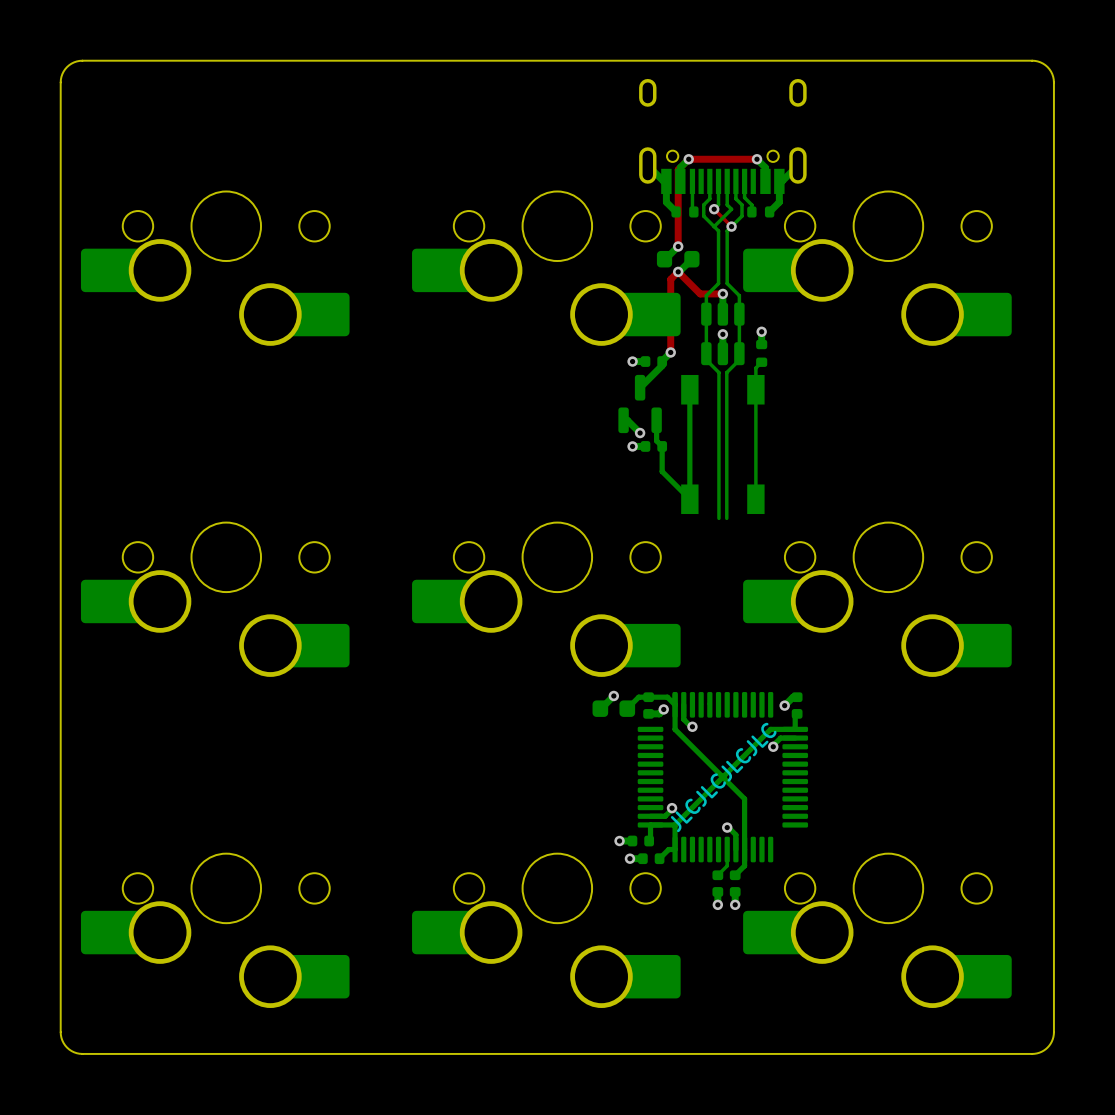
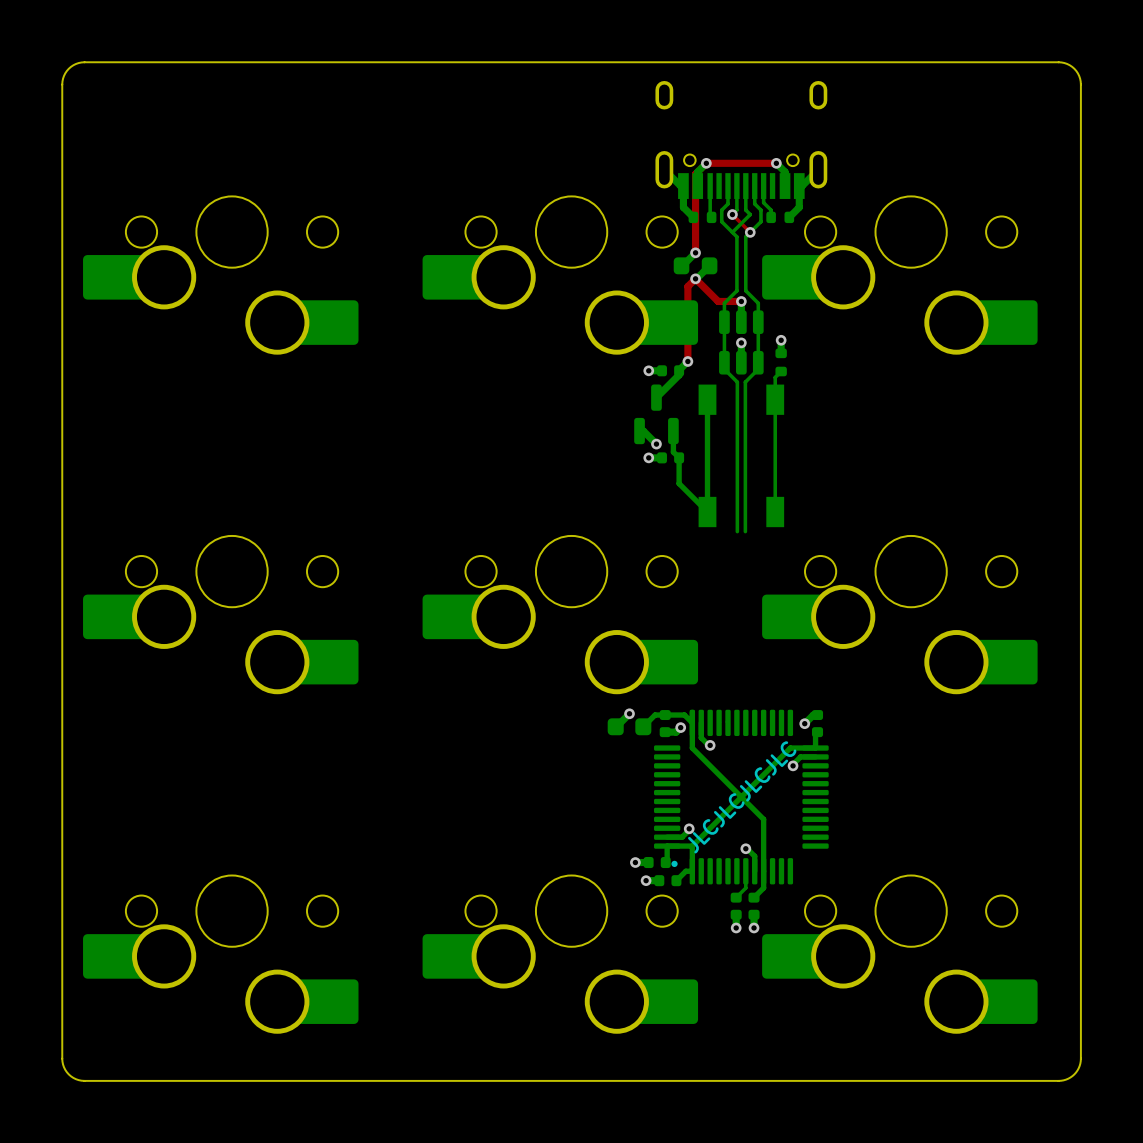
part footprint: [637, 692, 809, 863] -> [654, 709, 829, 885]

